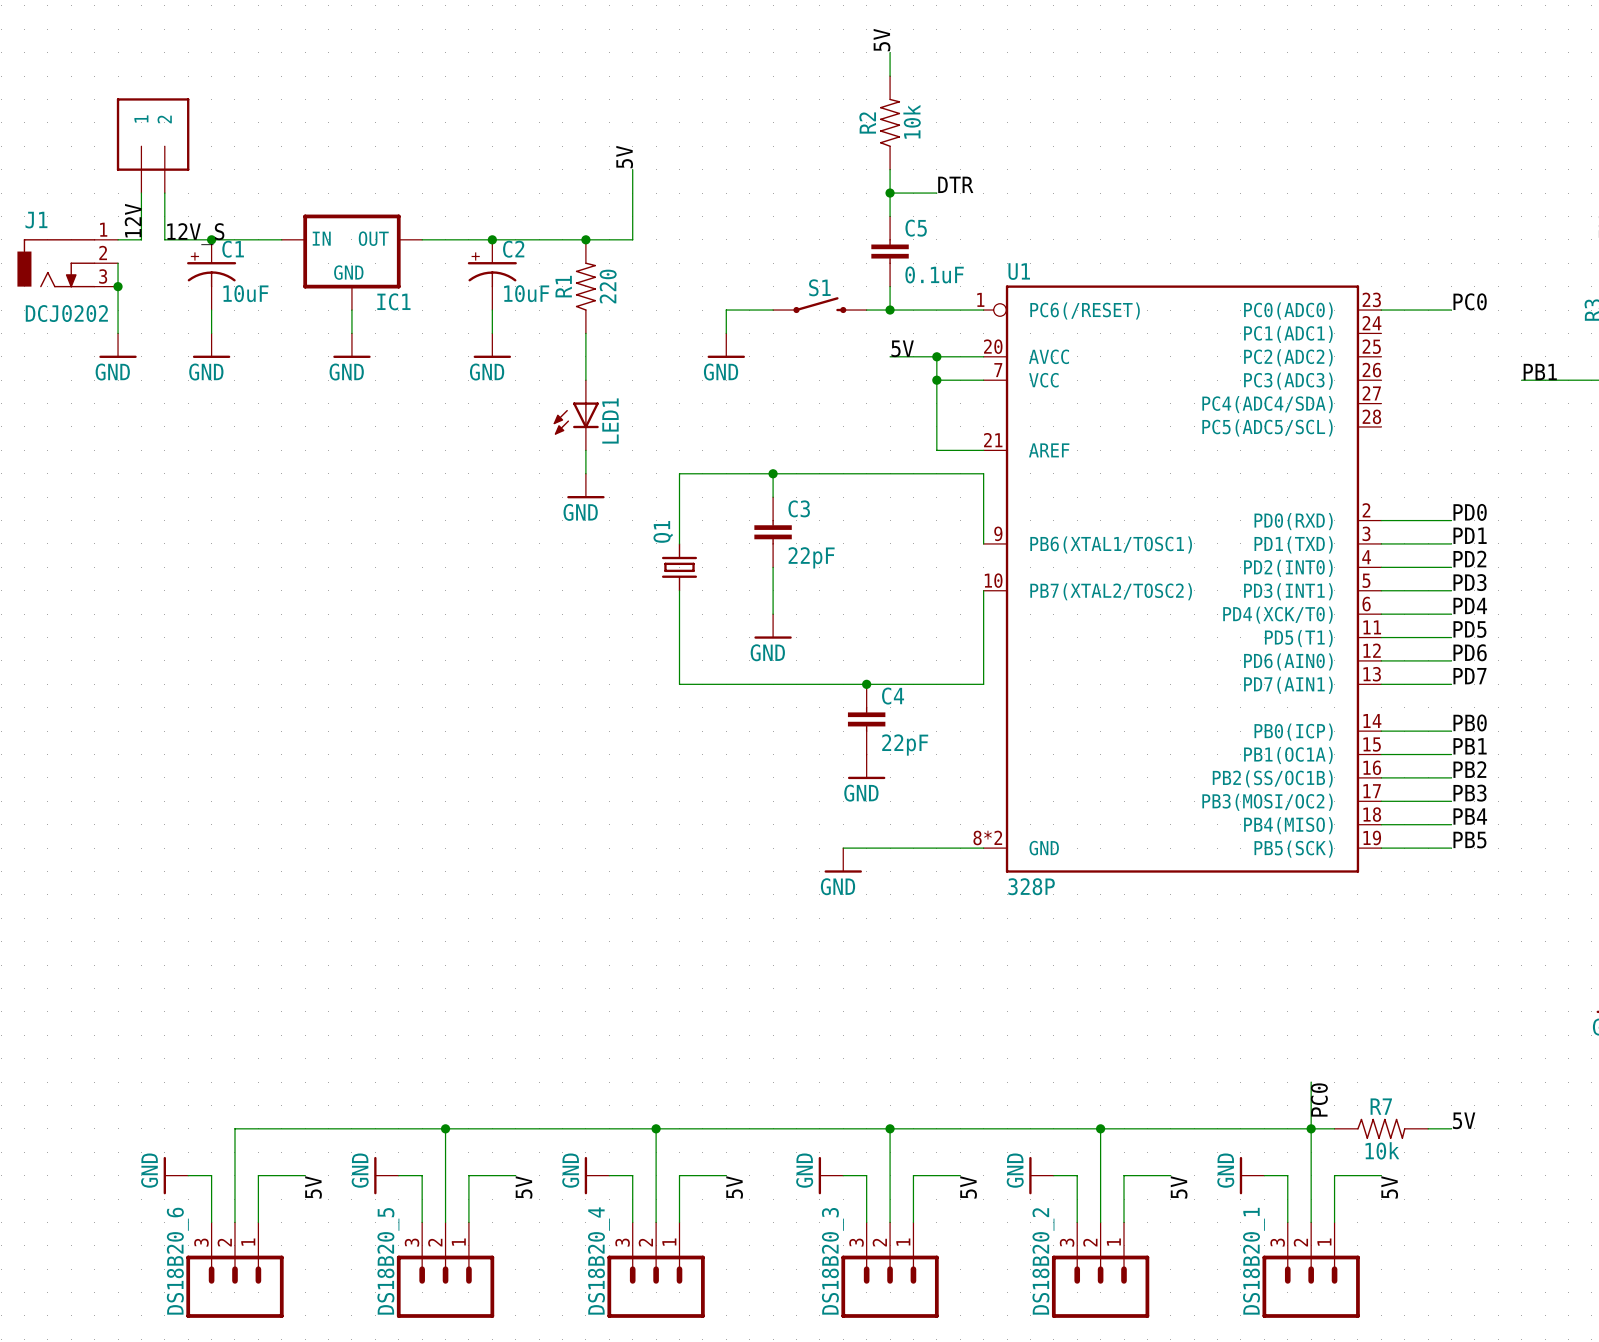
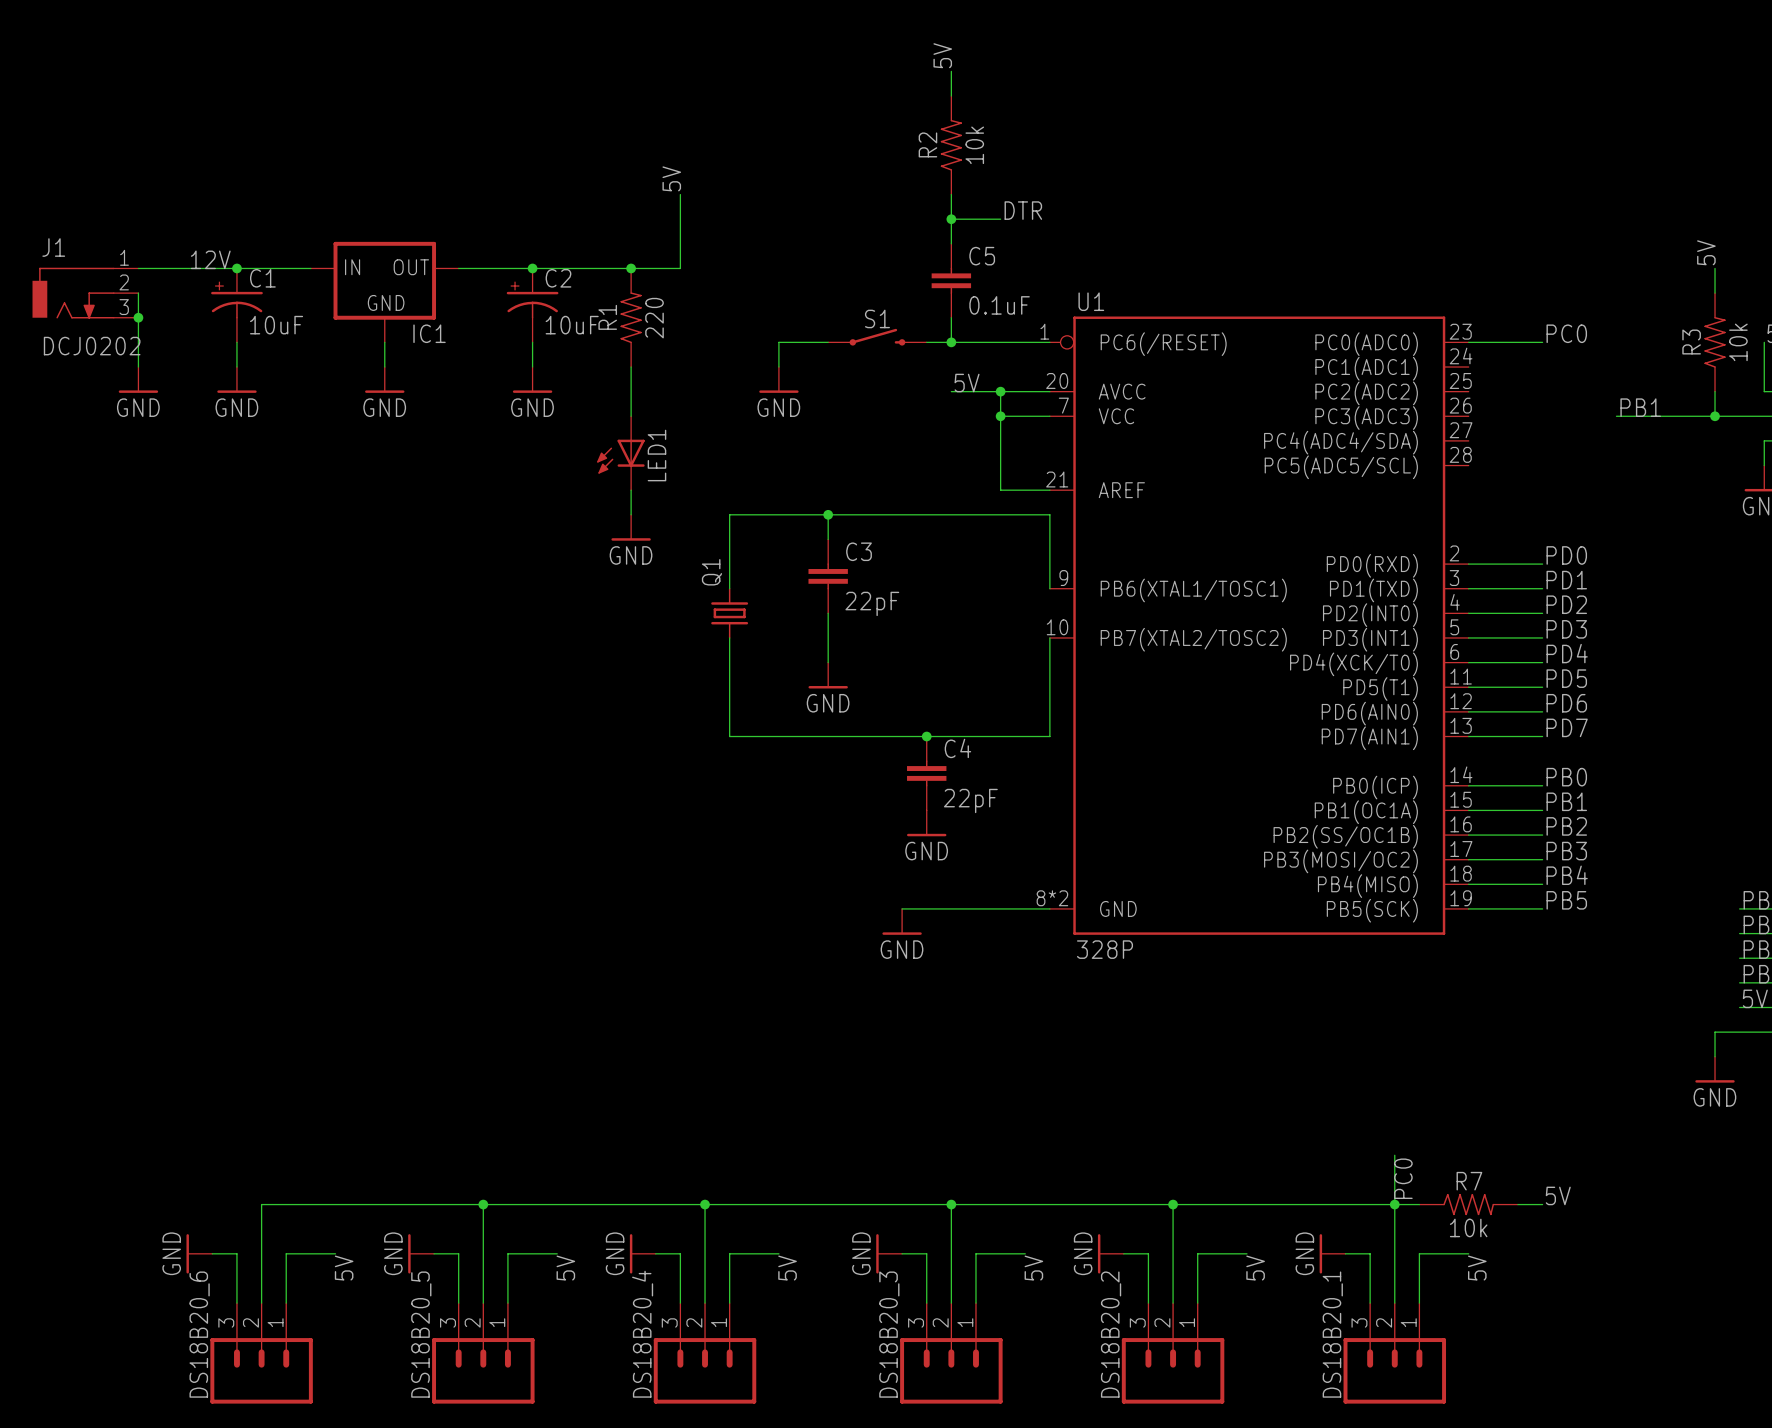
part: (153, 145) -> none
wire: (141, 193) (141, 239) -> (187, 268) (163, 268)
wire: (164, 193) (164, 239) -> none
label: 12V (133, 220) -> none
label: 12V_S (195, 234) -> 12V (210, 259)

